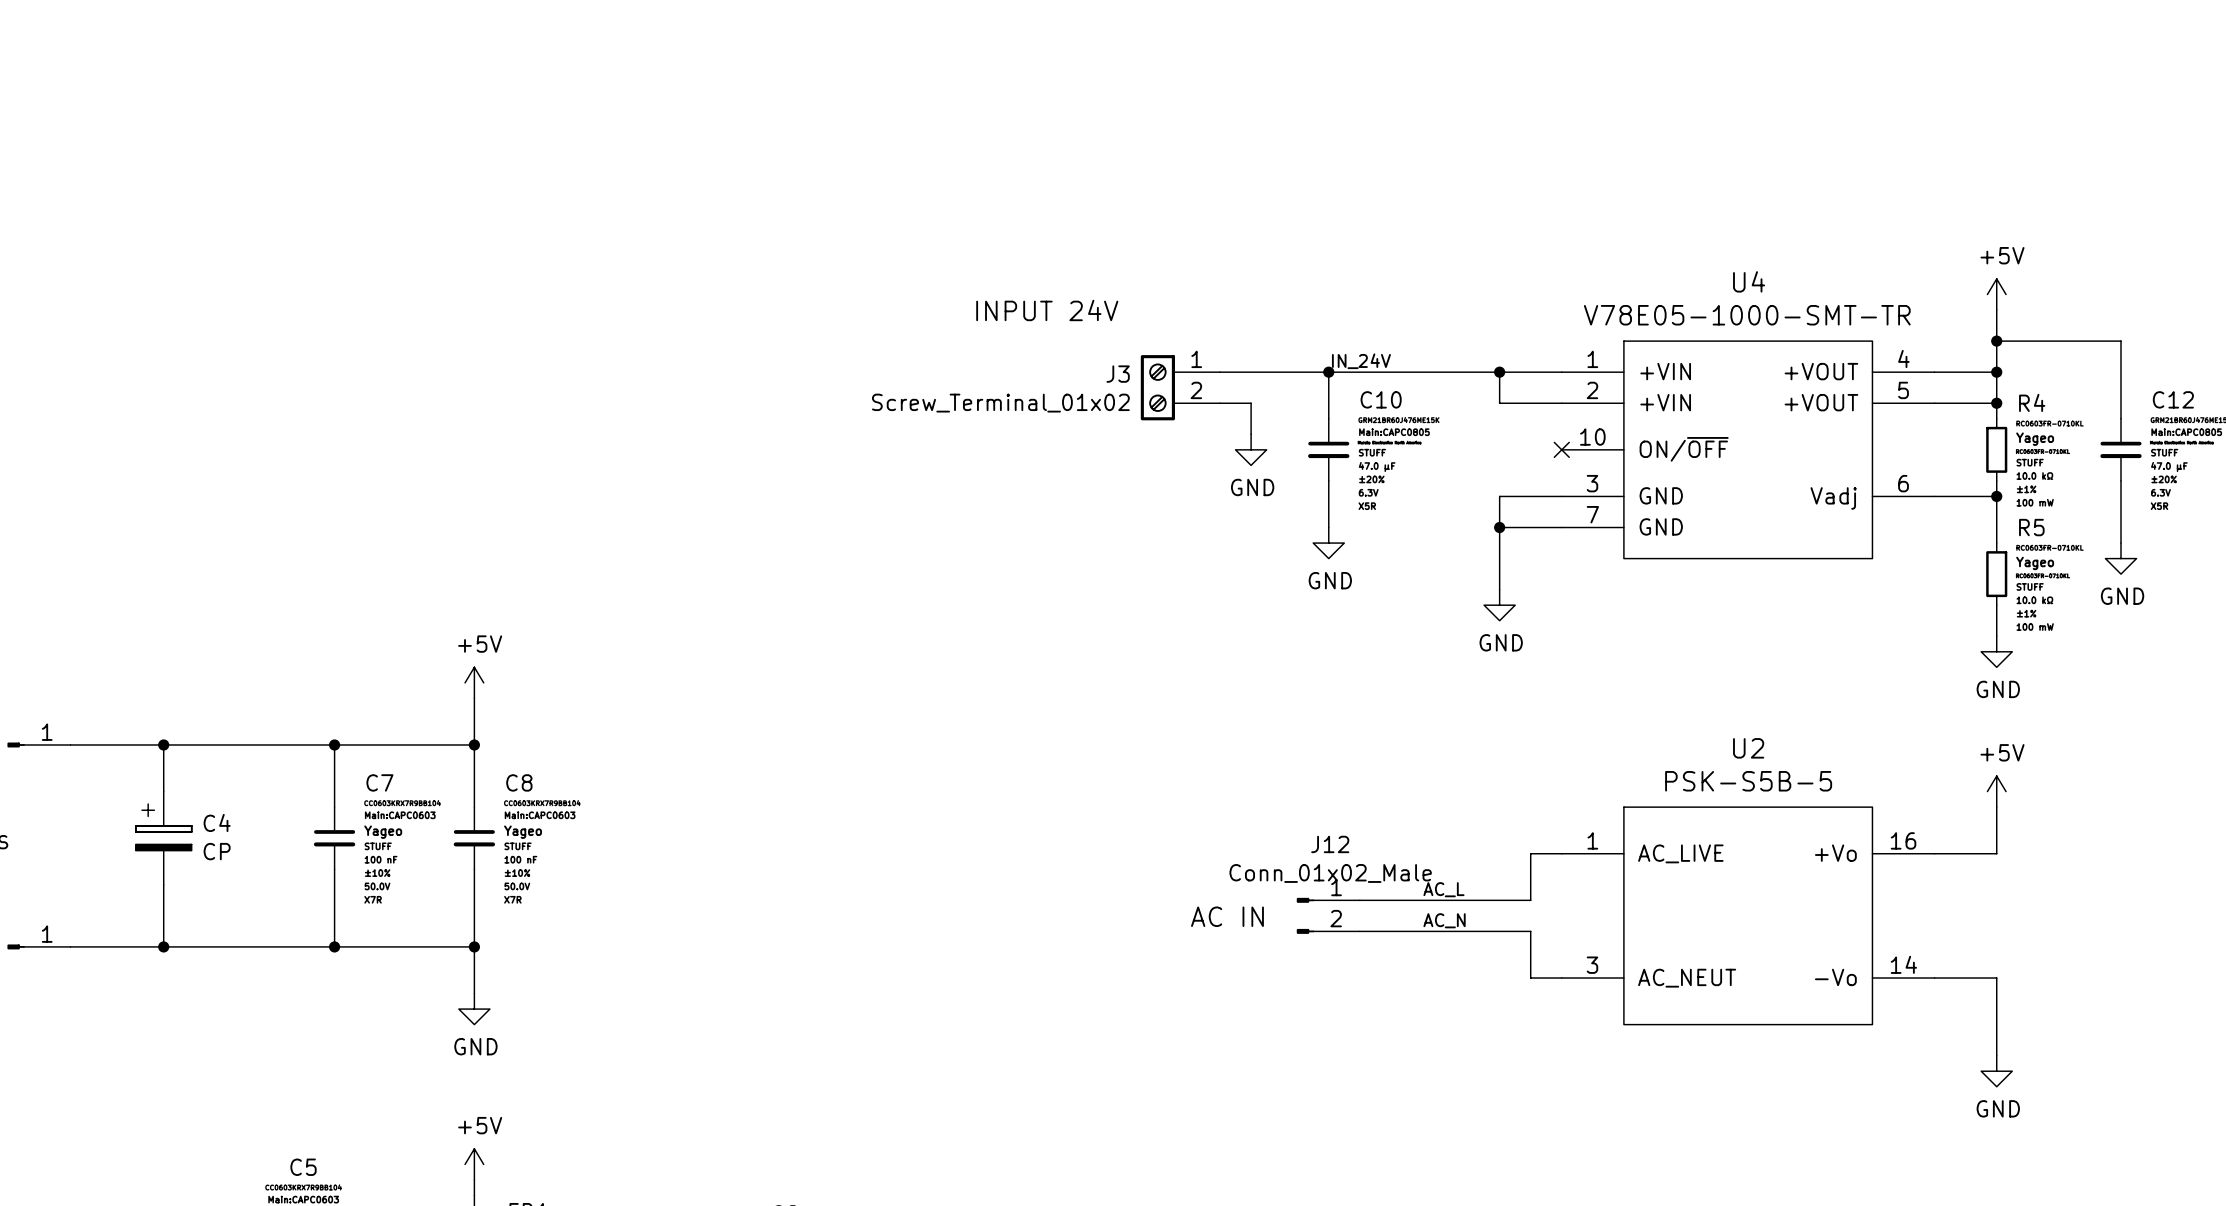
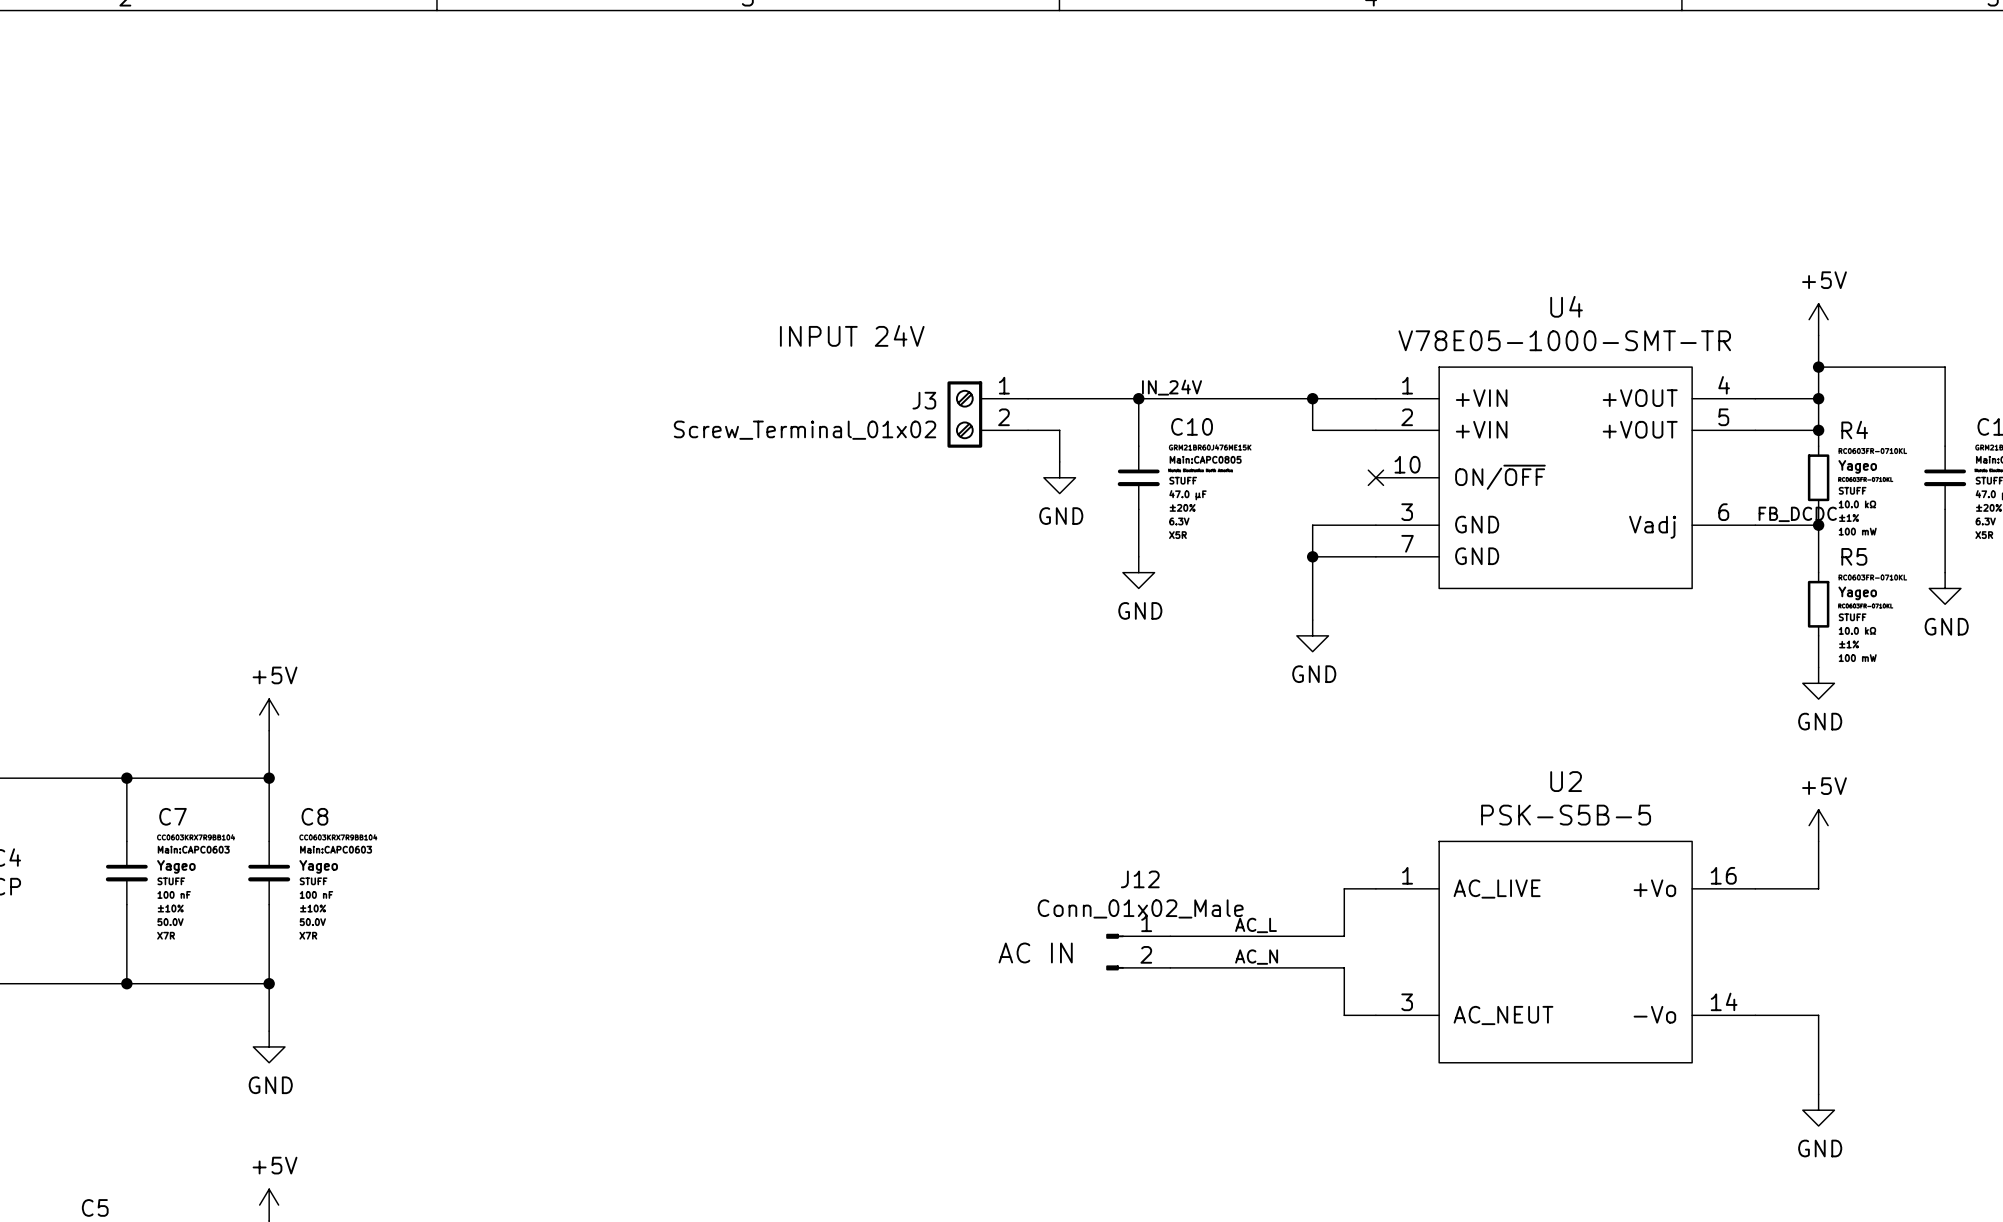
label: none -> FB_DCDC (1797, 514)

